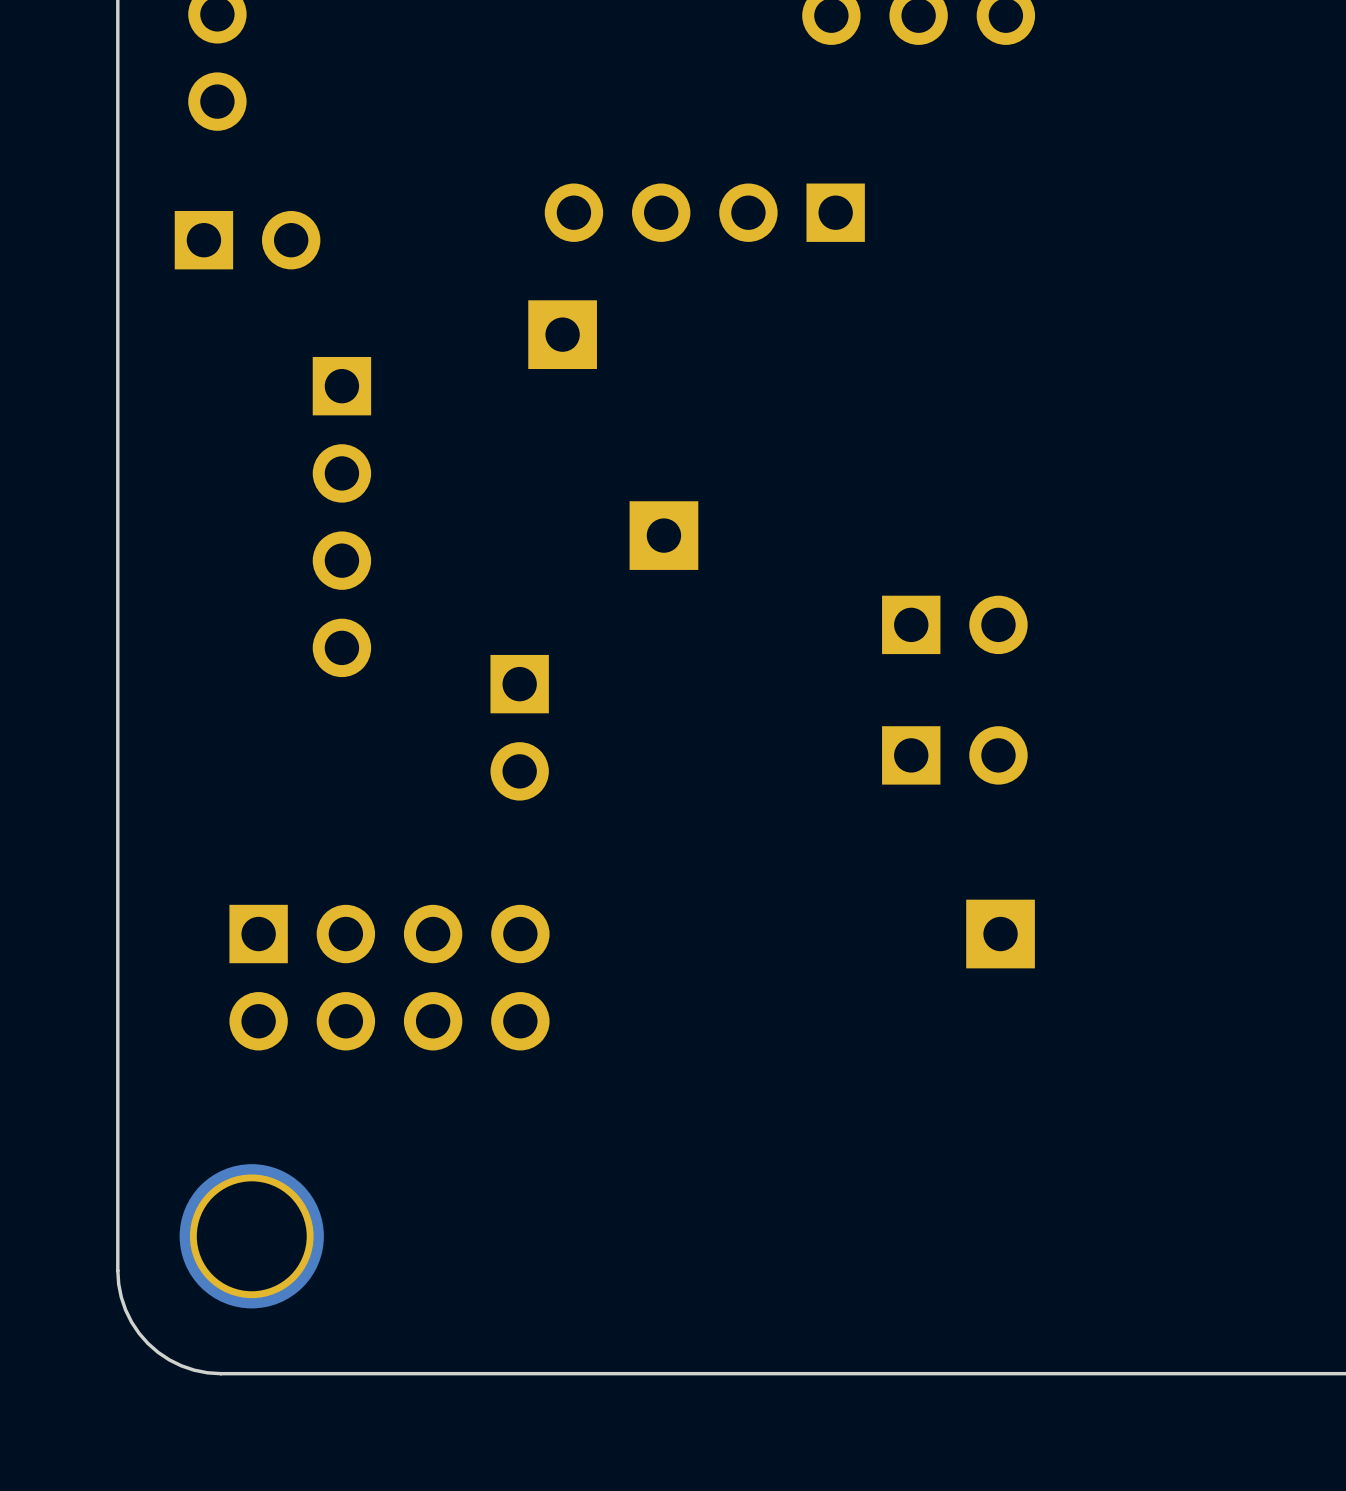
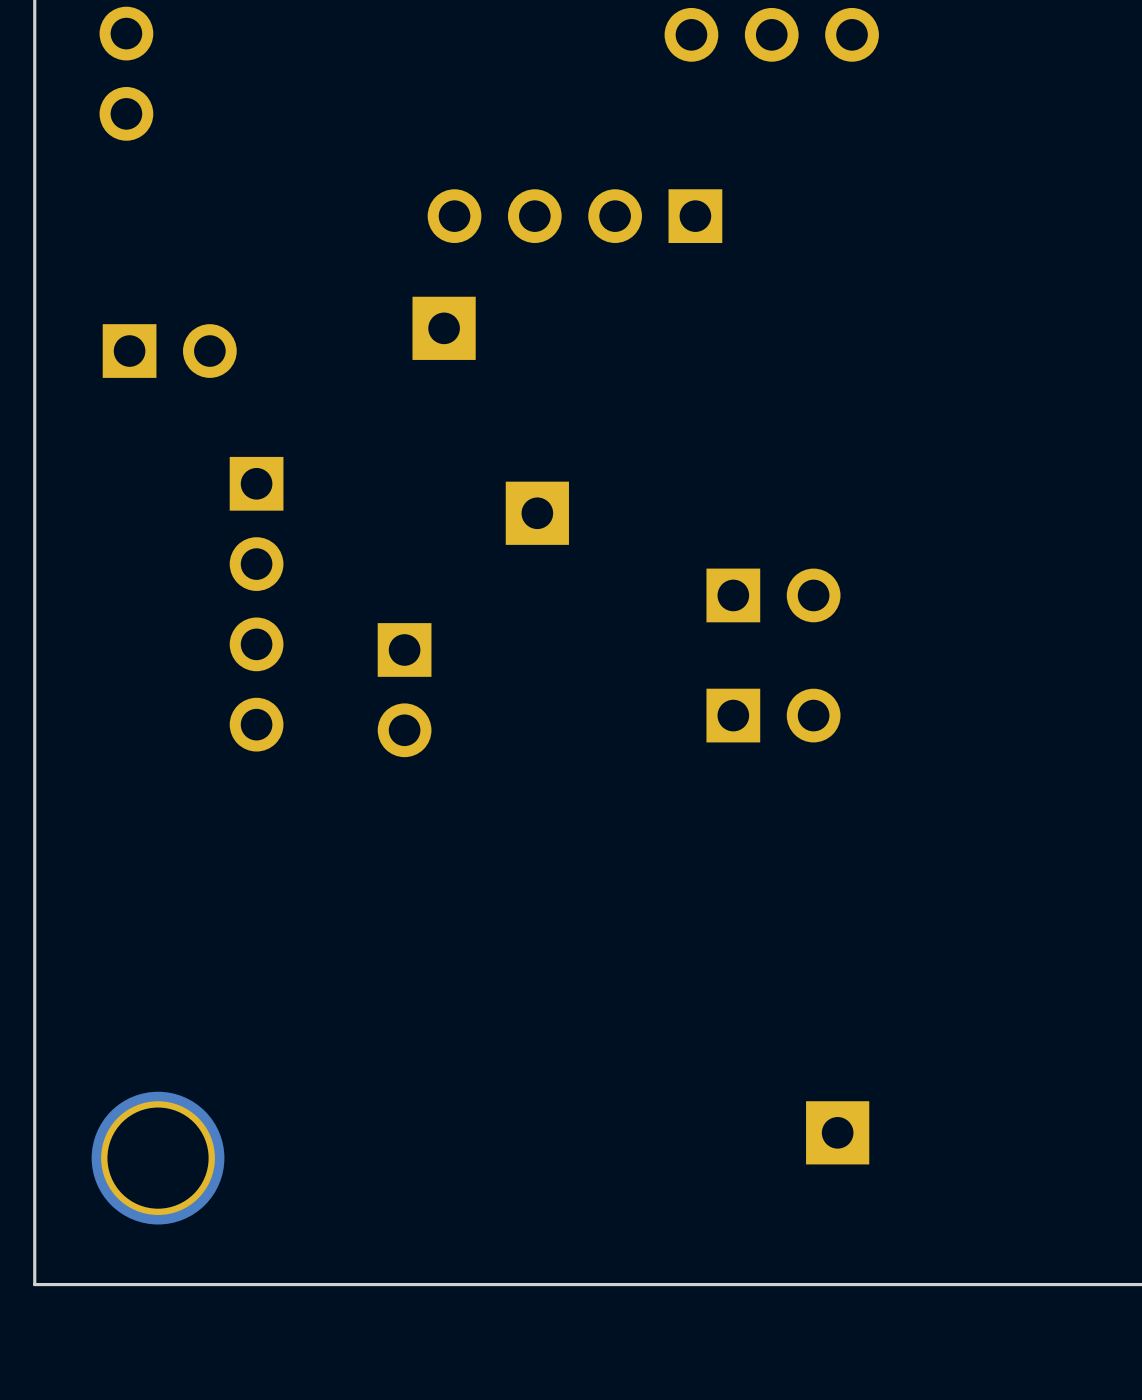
part position: (247, 240) -> (169, 351)
part position: (341, 517) -> (256, 604)
part position: (954, 624) -> (773, 595)
part position: (954, 755) -> (773, 715)
part position: (1000, 934) -> (837, 1132)
part: (389, 977) -> none
board edge: (117, 1270) (118, 1284) (125, 1310) (131, 1322) (147, 1343) (158, 1352) (181, 1365) (207, 1372) (220, 1373) -> (34, 1189) (34, 1284) (129, 1284)

